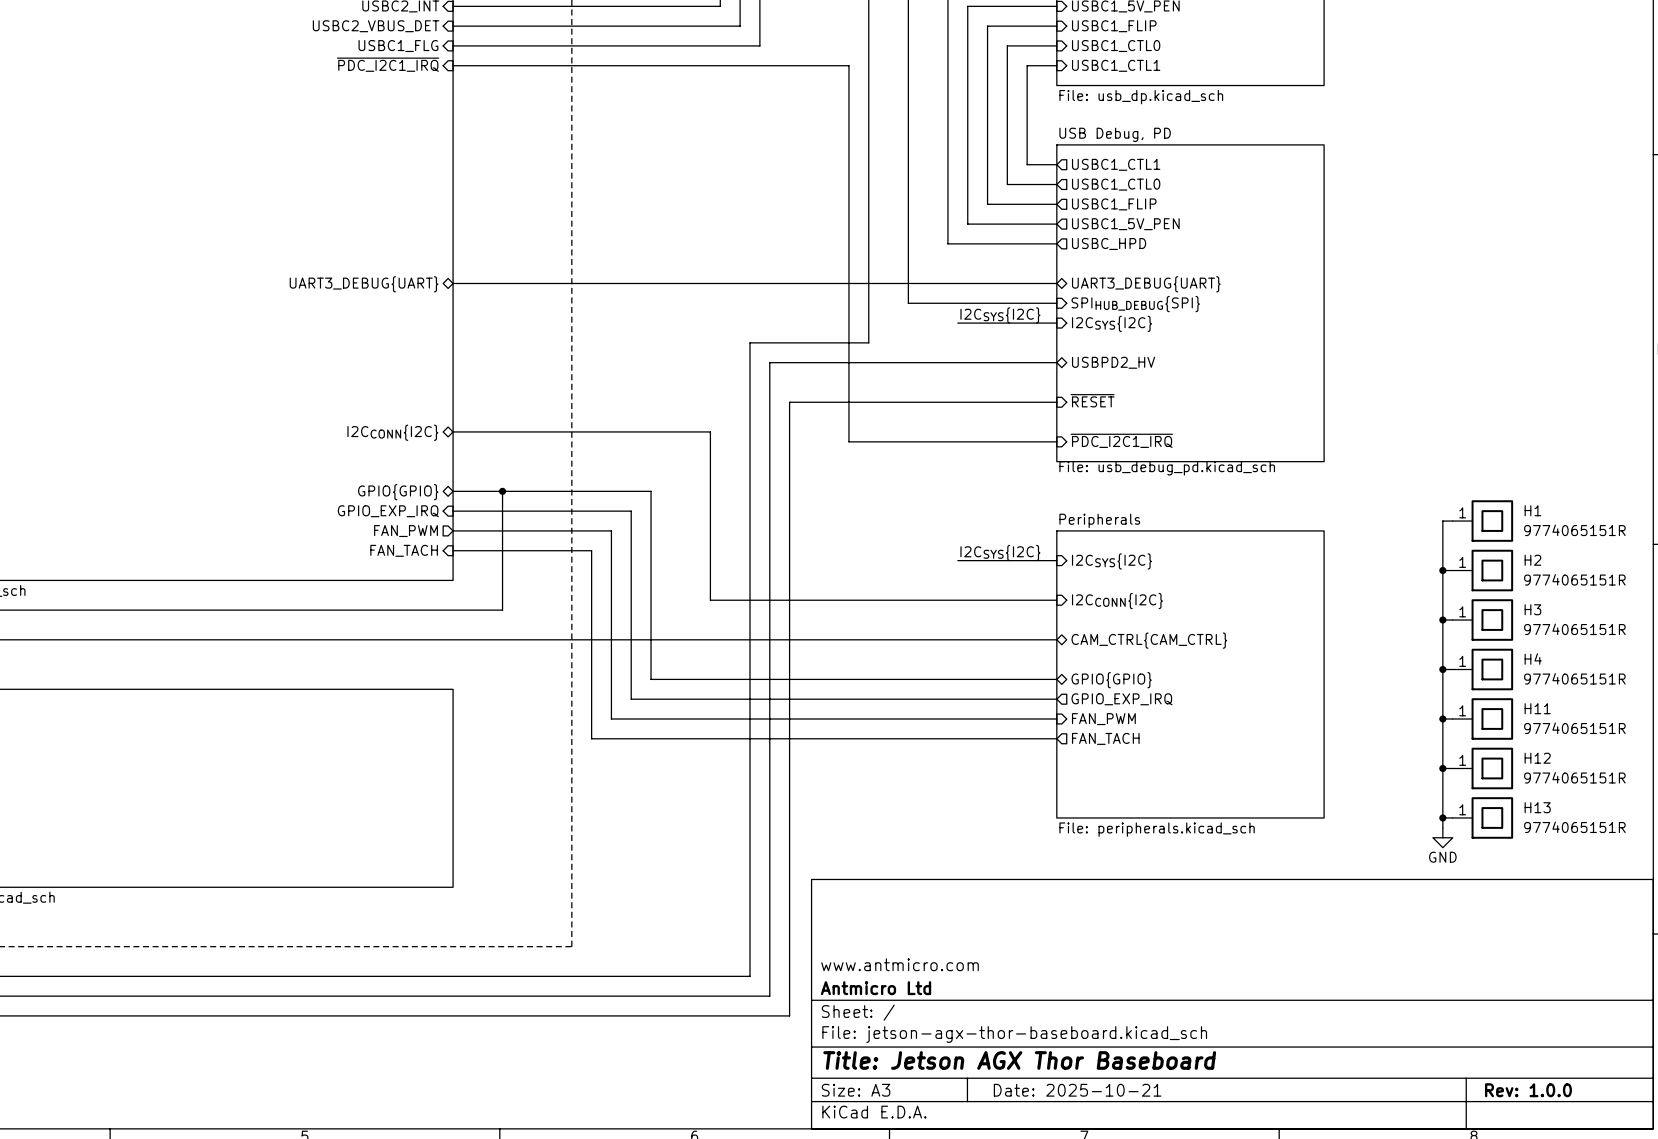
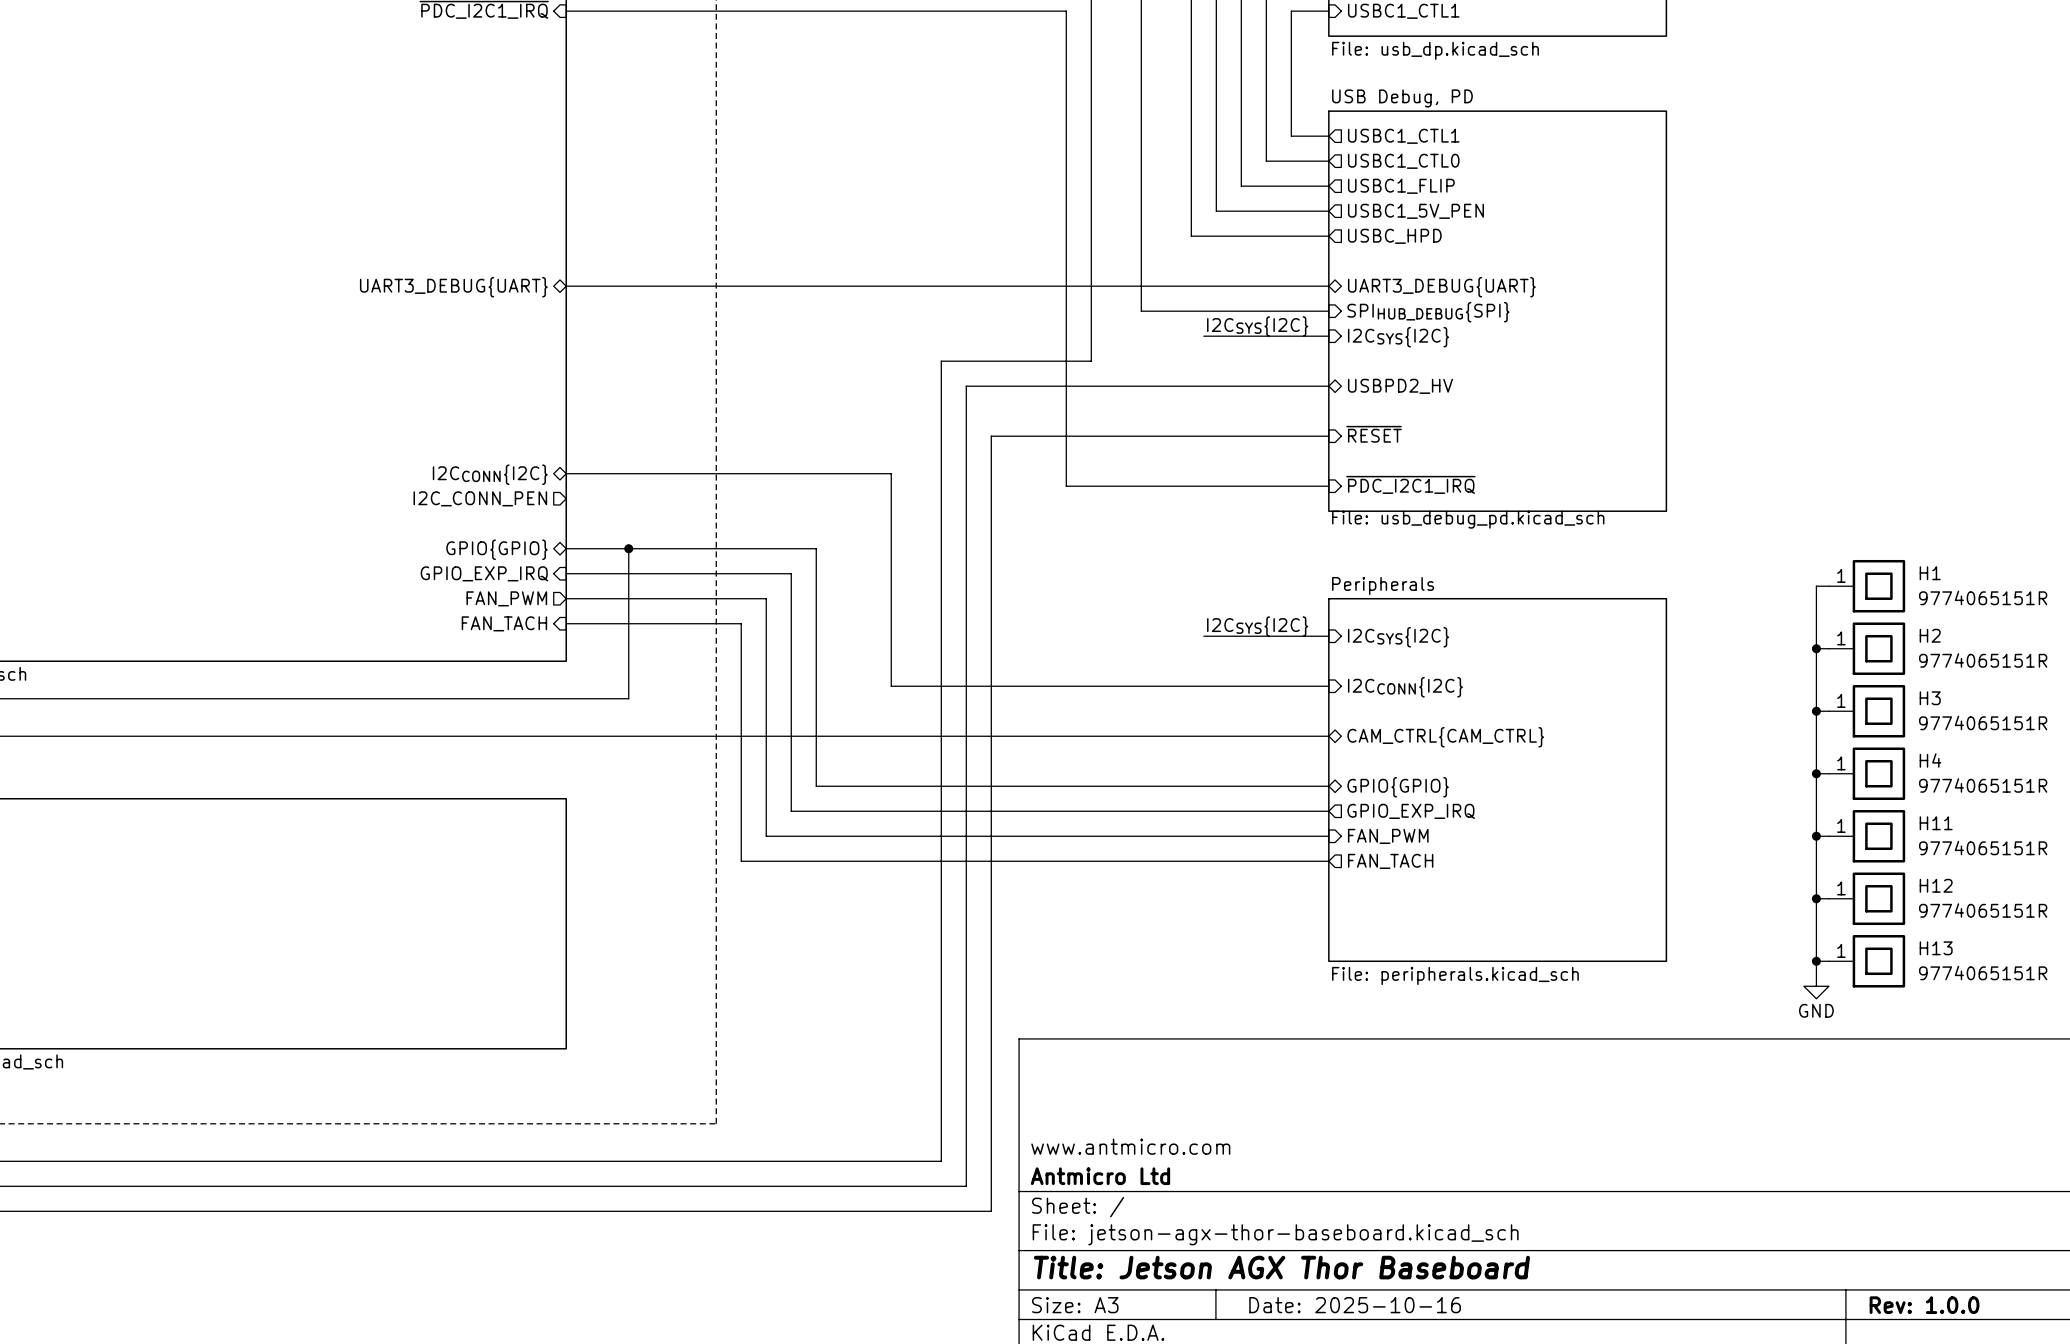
sheet pin: none -> I2C_CONN_PEN (480, 498)
title block: Date: 2025-10-21 (1077, 1090) -> Date: 2025-10-16 (1355, 1305)

